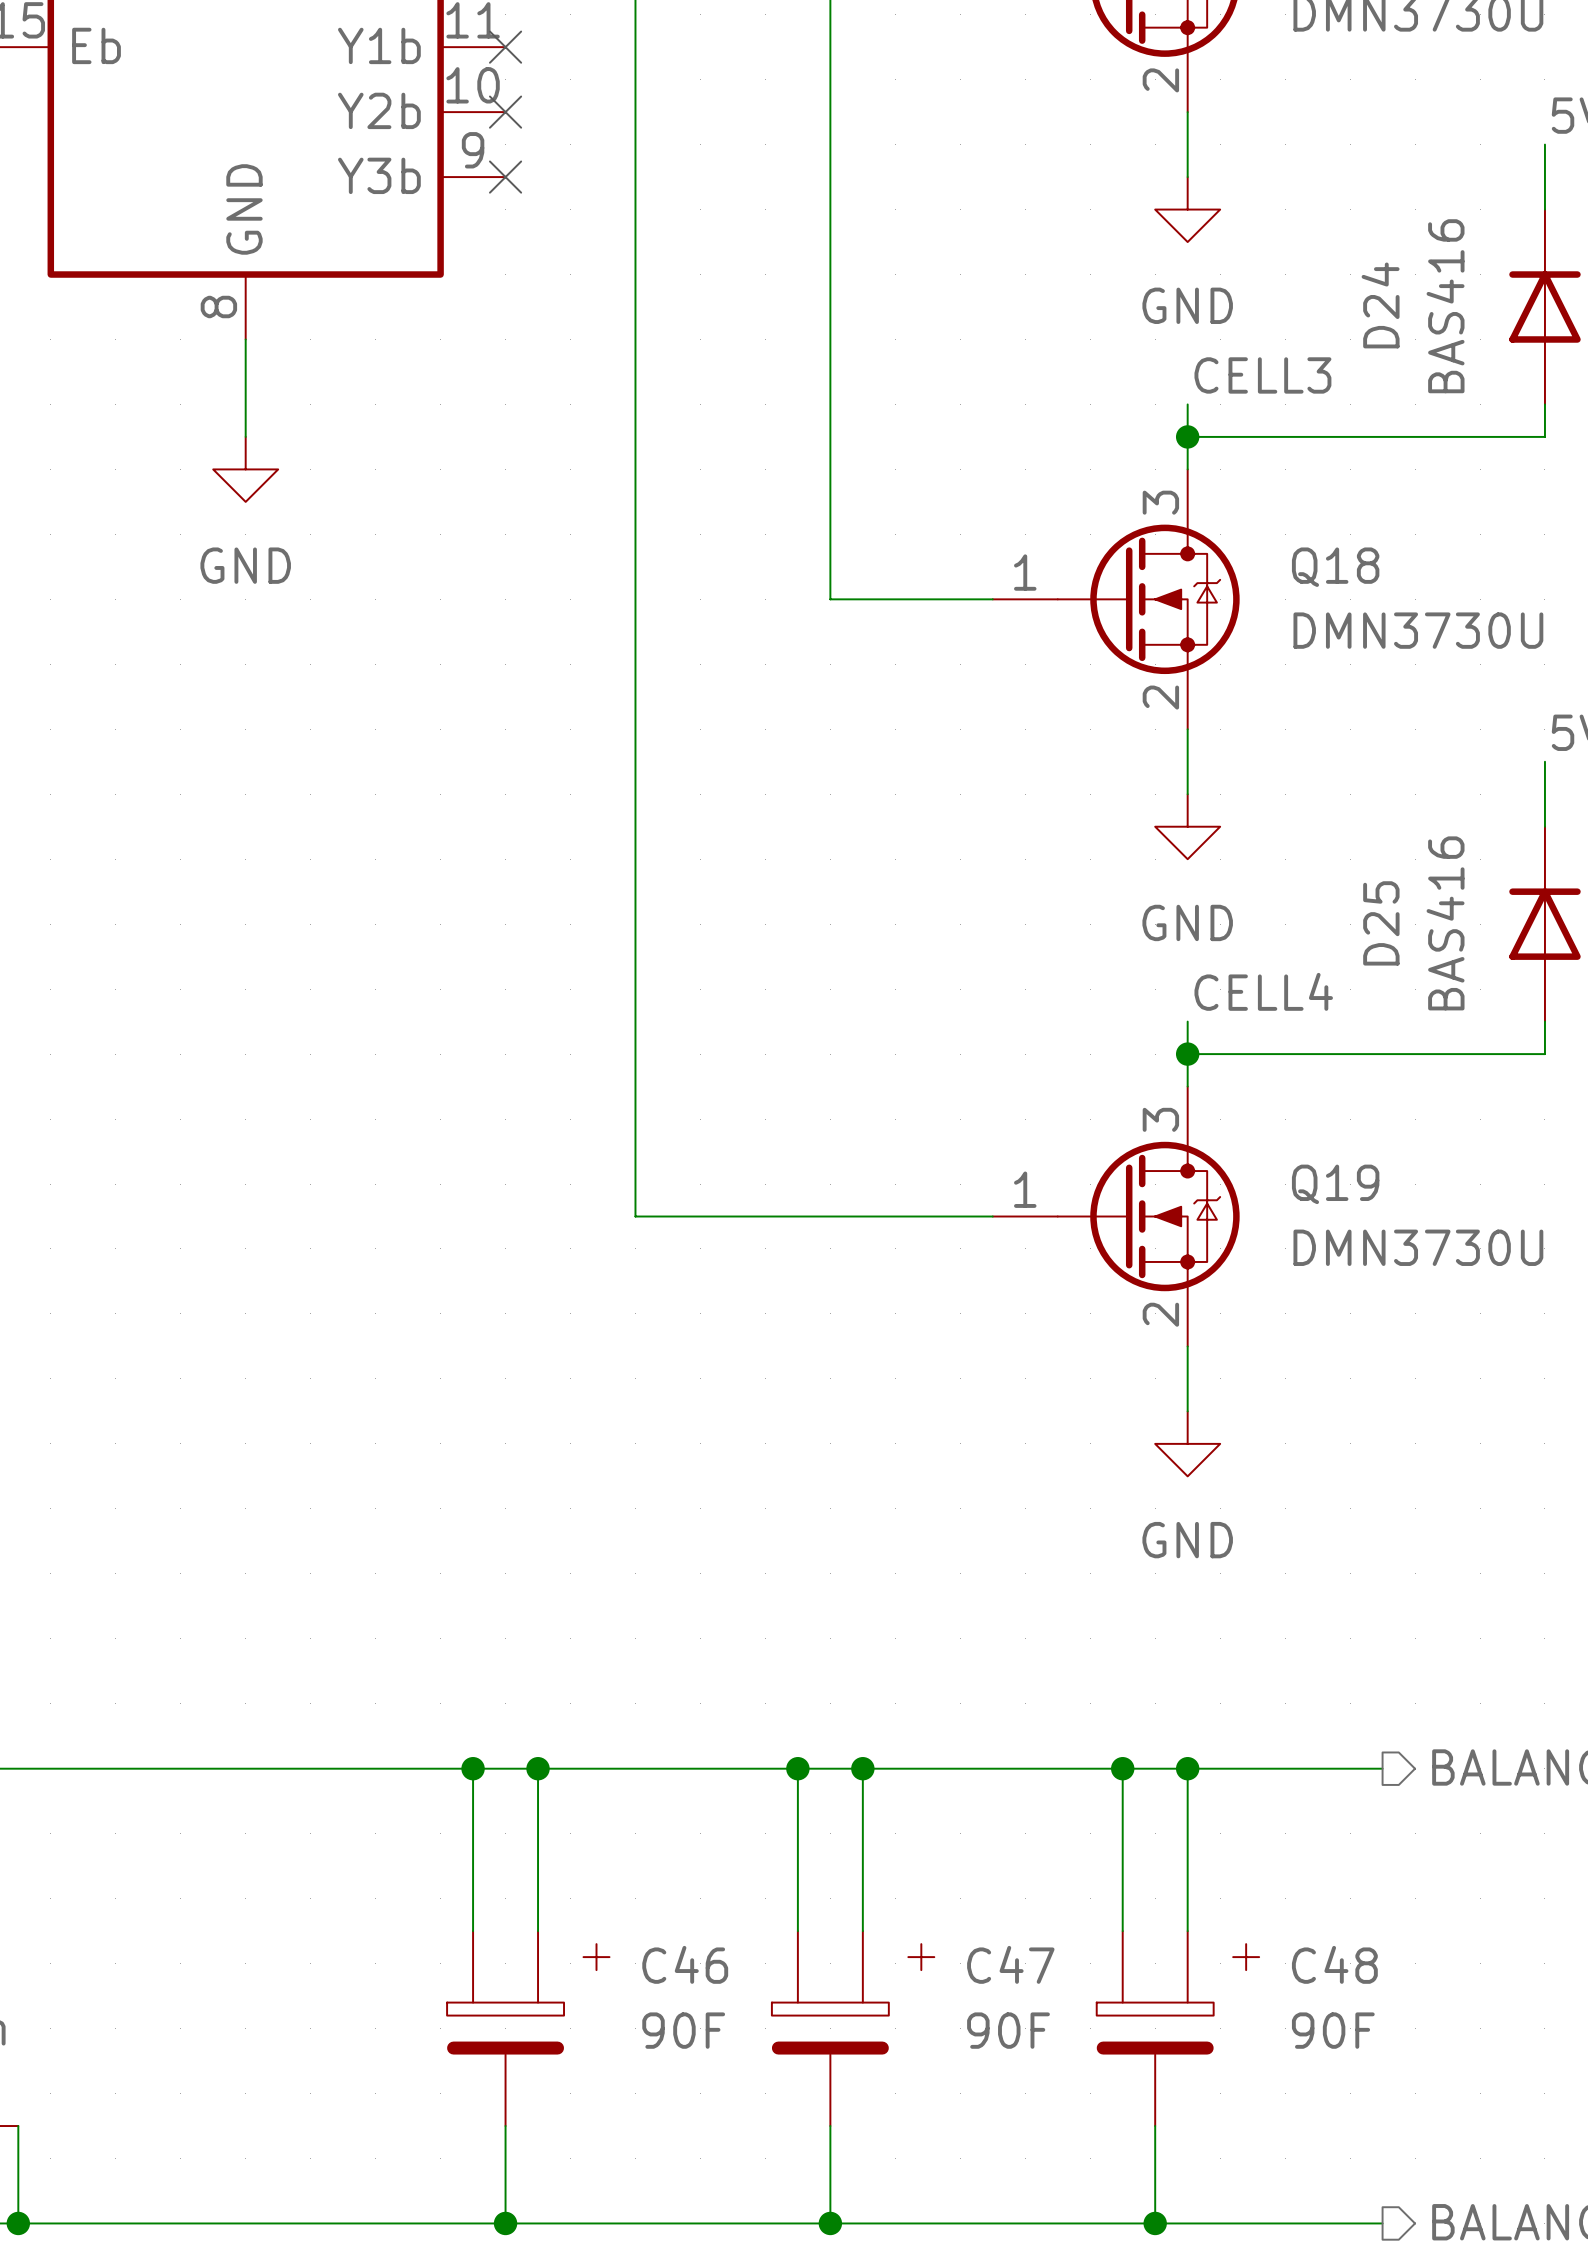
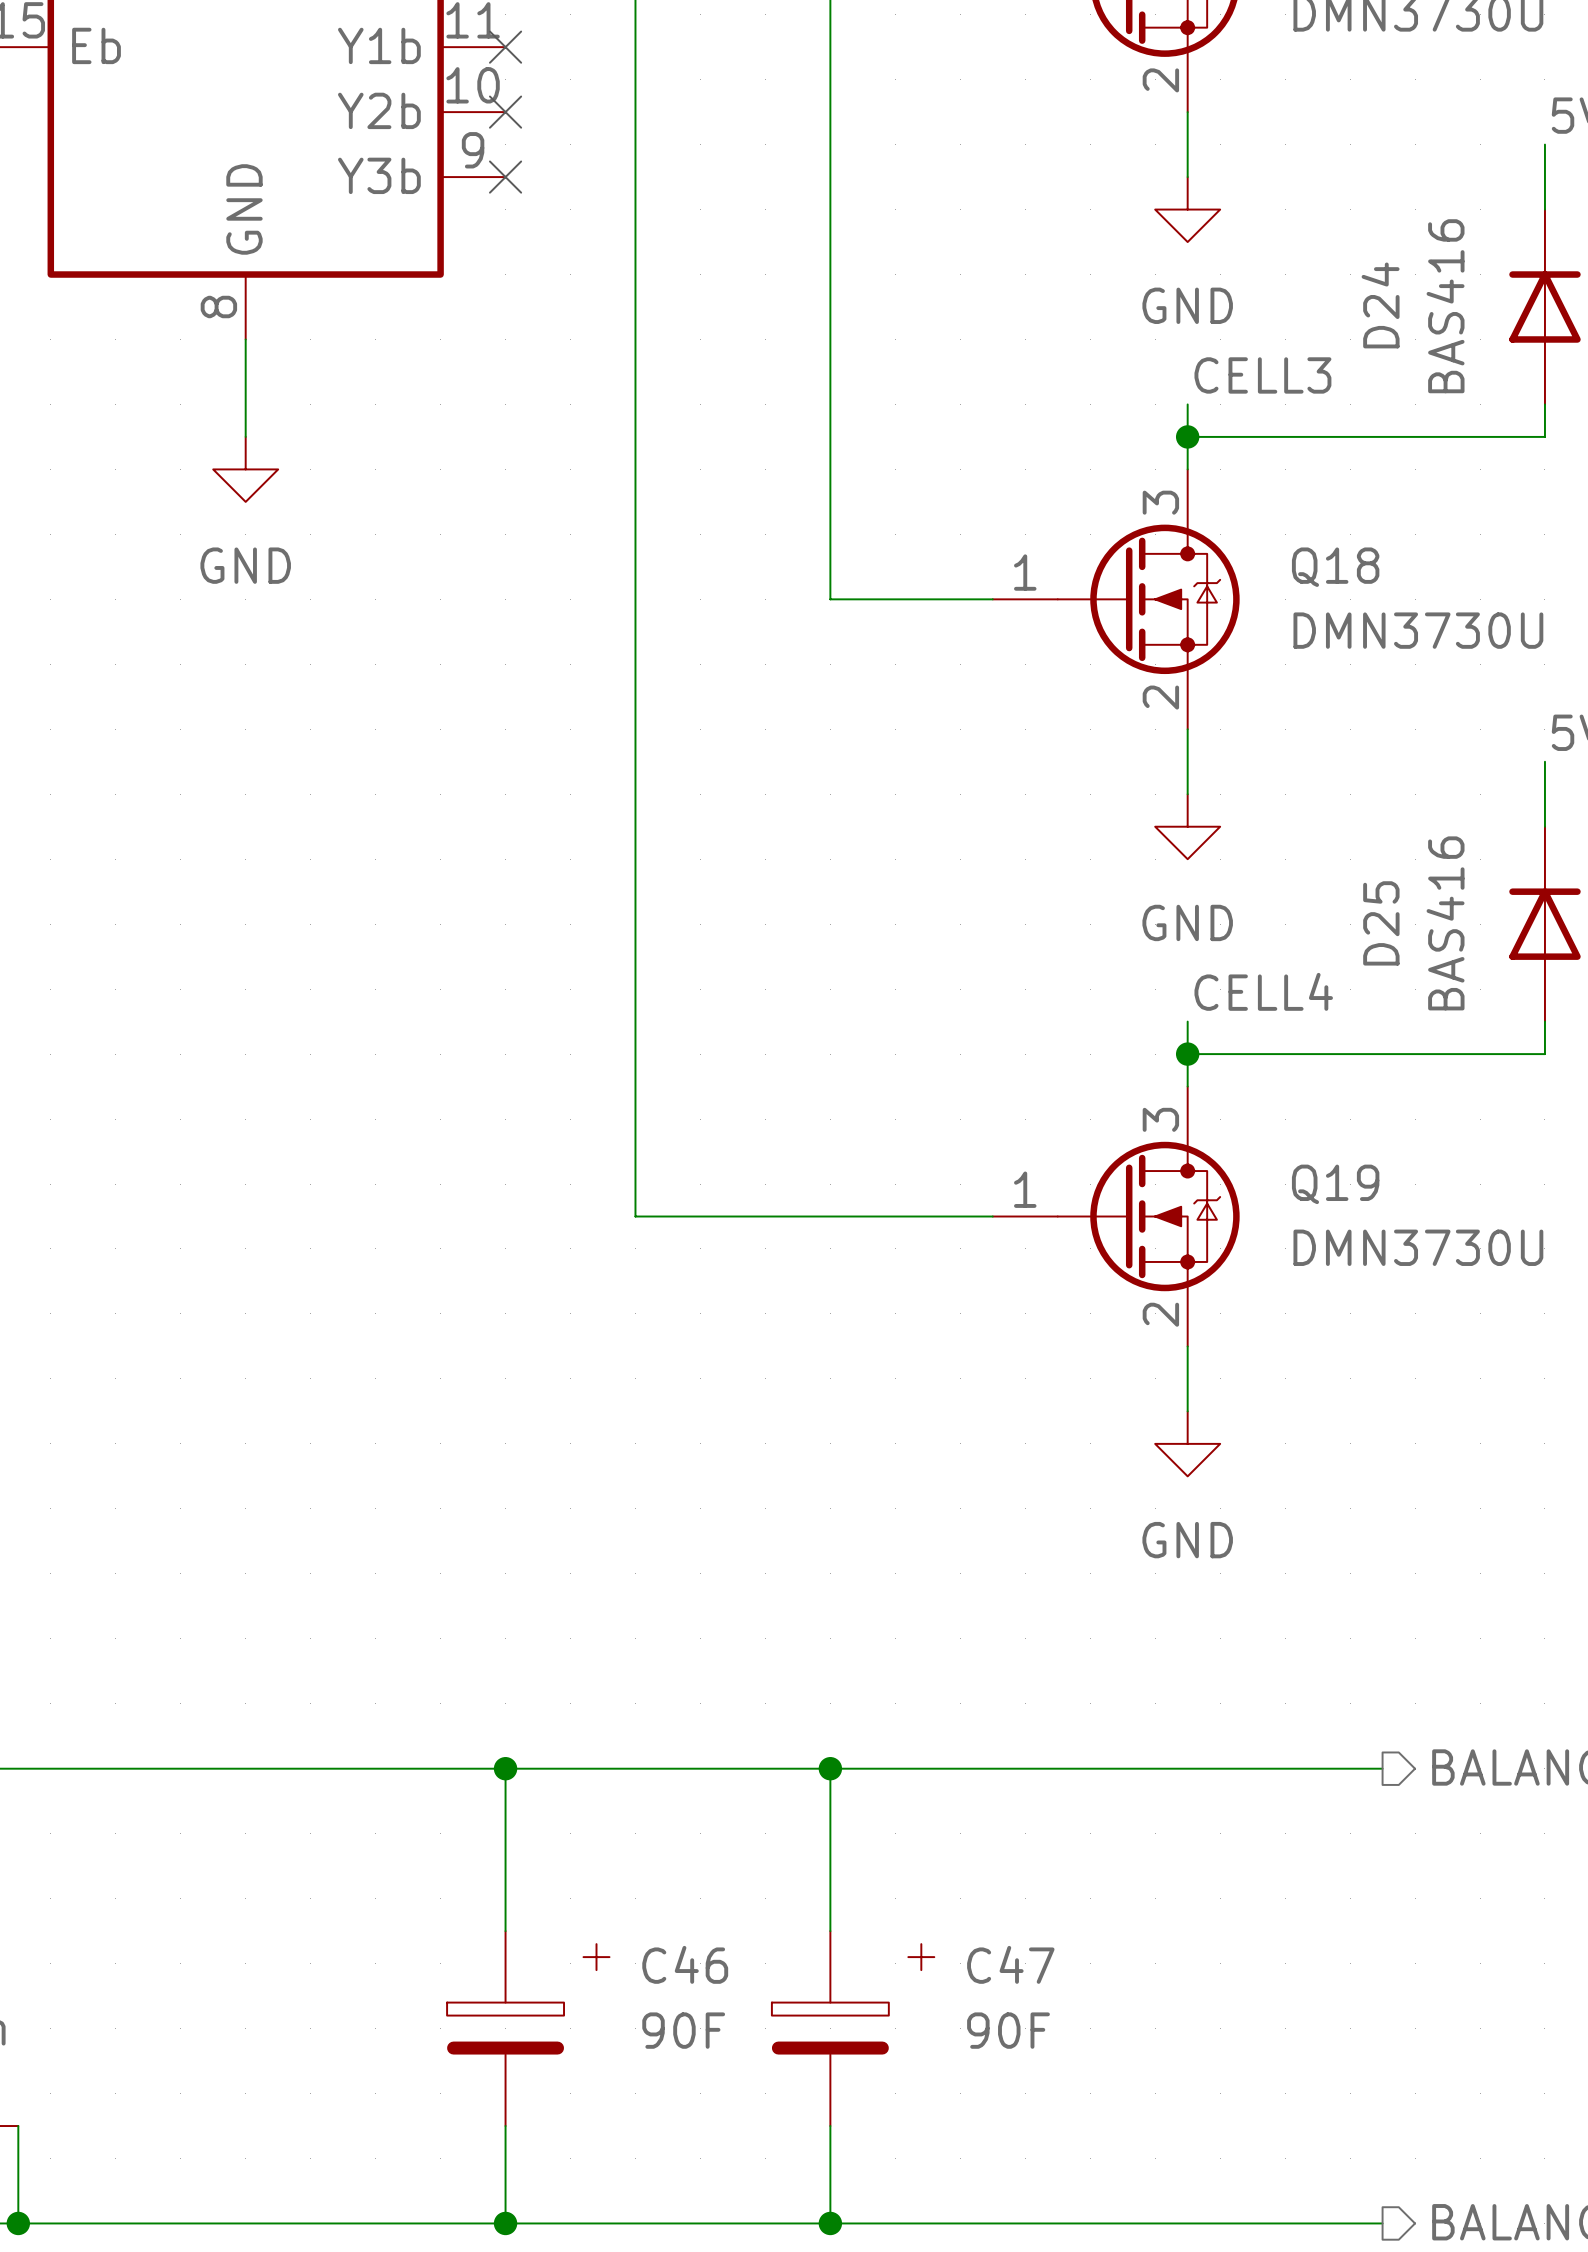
wire: (473, 1768) (473, 1931) -> (505, 1768) (505, 1931)
junction: (473, 1768) -> none
junction: none -> (505, 1768)
wire: (538, 1768) (538, 1931) -> none
junction: (538, 1768) -> none
wire: (797, 1768) (797, 1931) -> none
junction: (797, 1768) -> none
junction: none -> (830, 1768)
wire: (862, 1768) (862, 1931) -> (830, 1768) (830, 1931)
junction: (862, 1768) -> none
wire: (1122, 1768) (1122, 1931) -> none
junction: (1122, 1768) -> none
wire: (1187, 1768) (1187, 1931) -> none
junction: (1187, 1768) -> none
C46 symbol: [447, 1931, 610, 2127] -> [447, 1931, 610, 2127]
C47 symbol: [771, 1931, 935, 2127] -> [771, 1931, 935, 2127]
C48: 90F (1177, 2028) -> none
wire: (1155, 2126) (1155, 2223) -> none
junction: (1155, 2223) -> none

